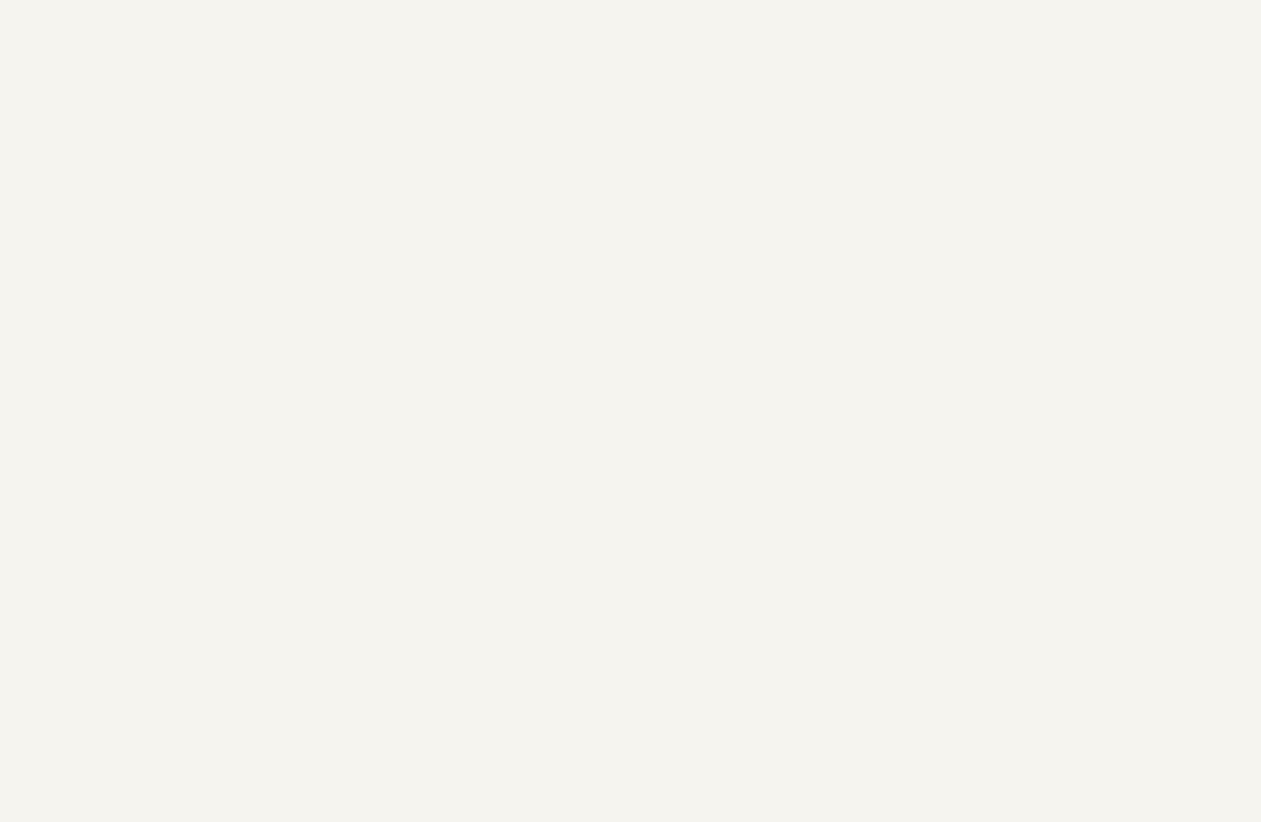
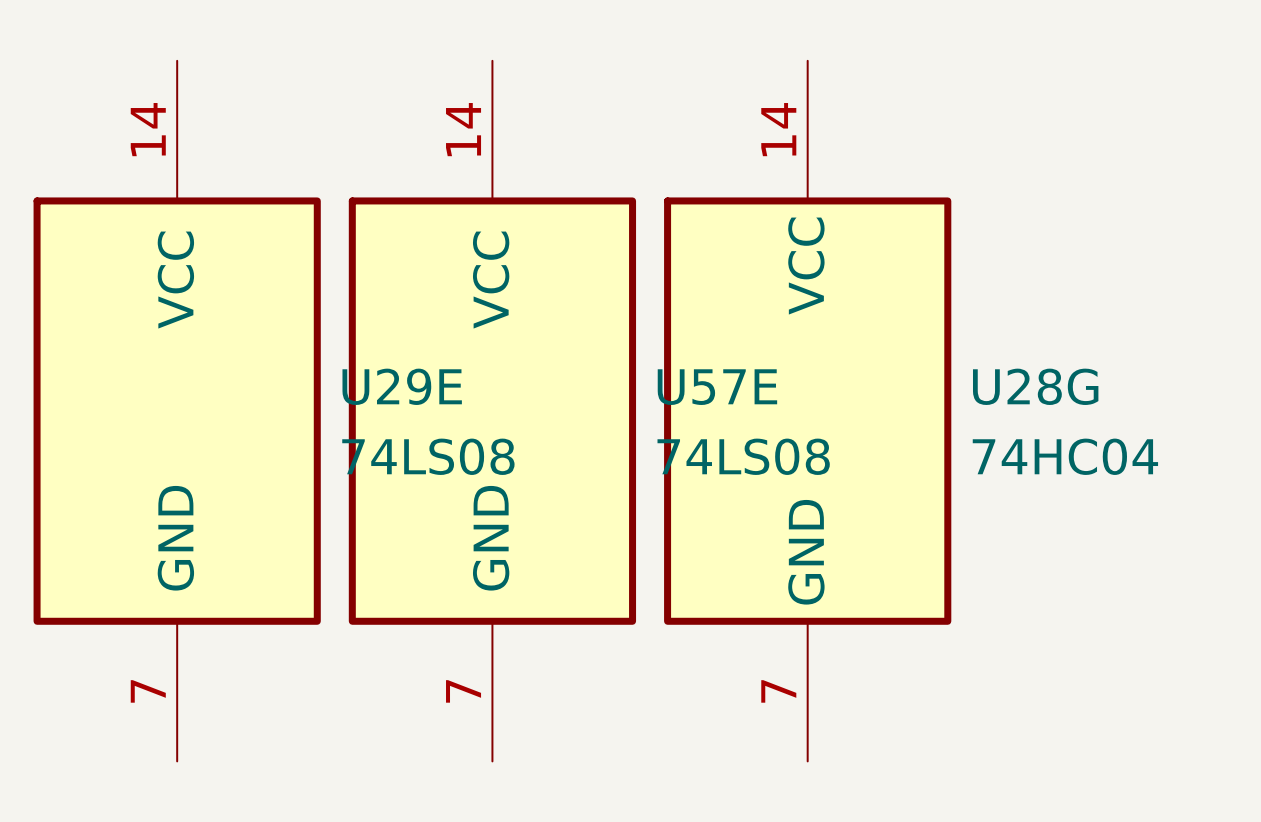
U29E: none -> 74LS08 (177, 411)
U57E: none -> 74LS08 (492, 411)
U28G: none -> 74HC04 (807, 411)

